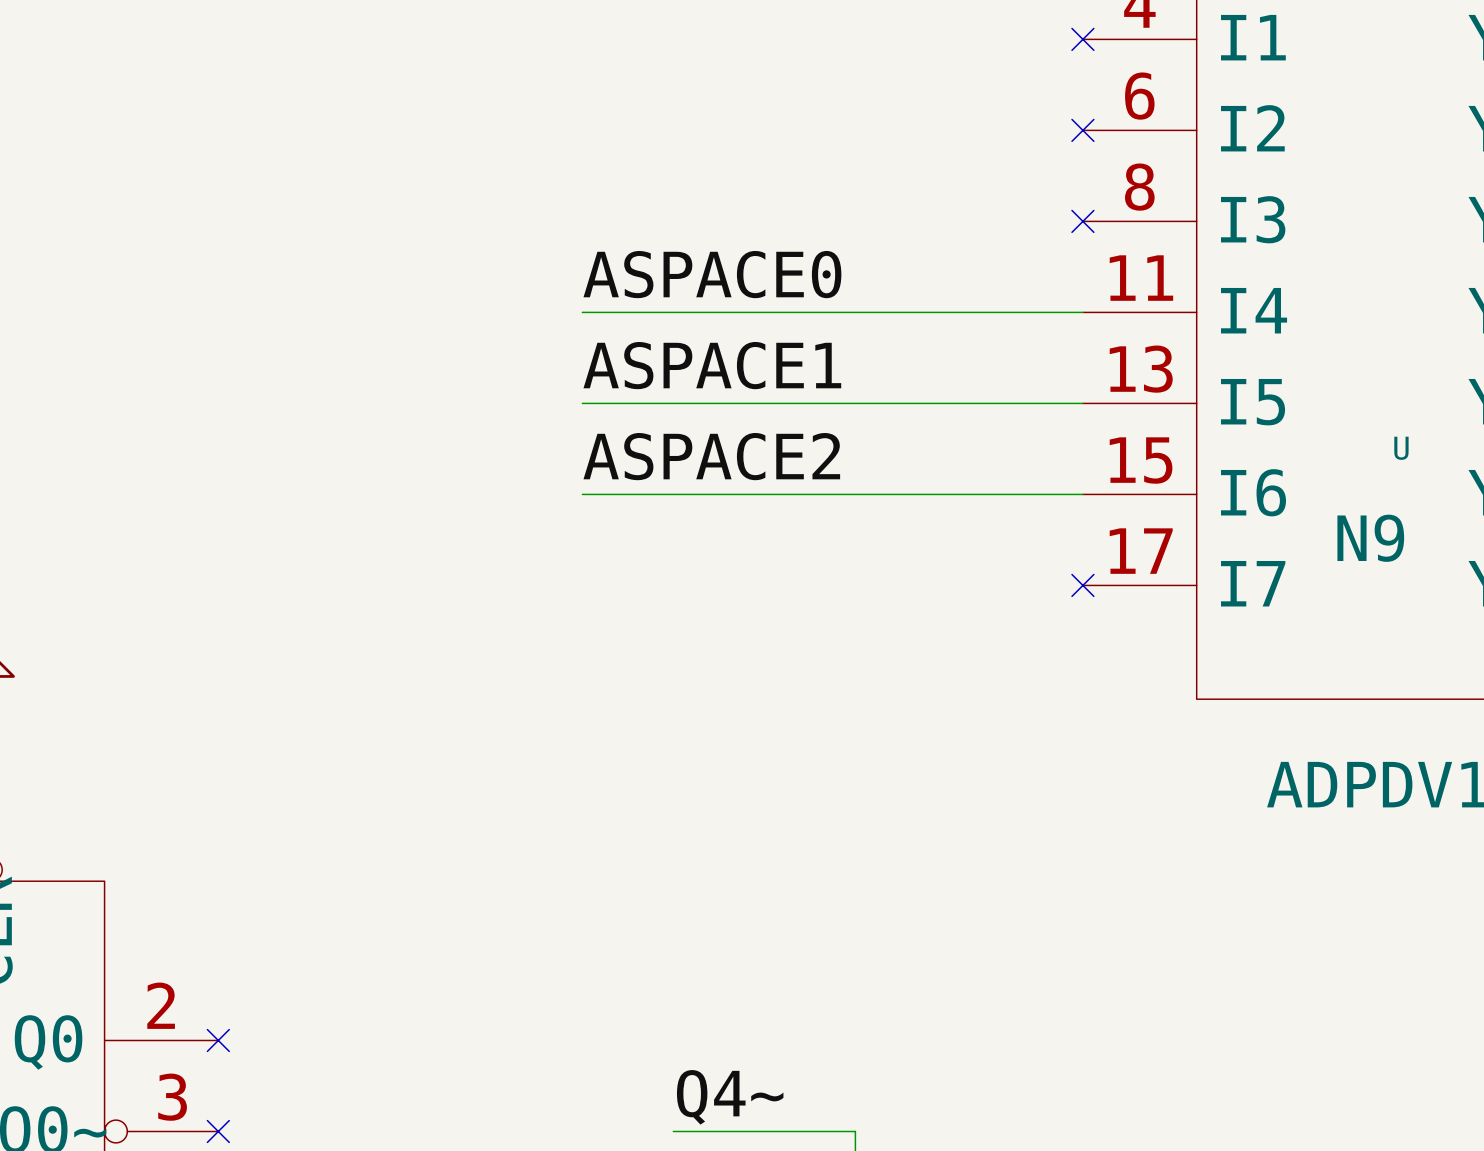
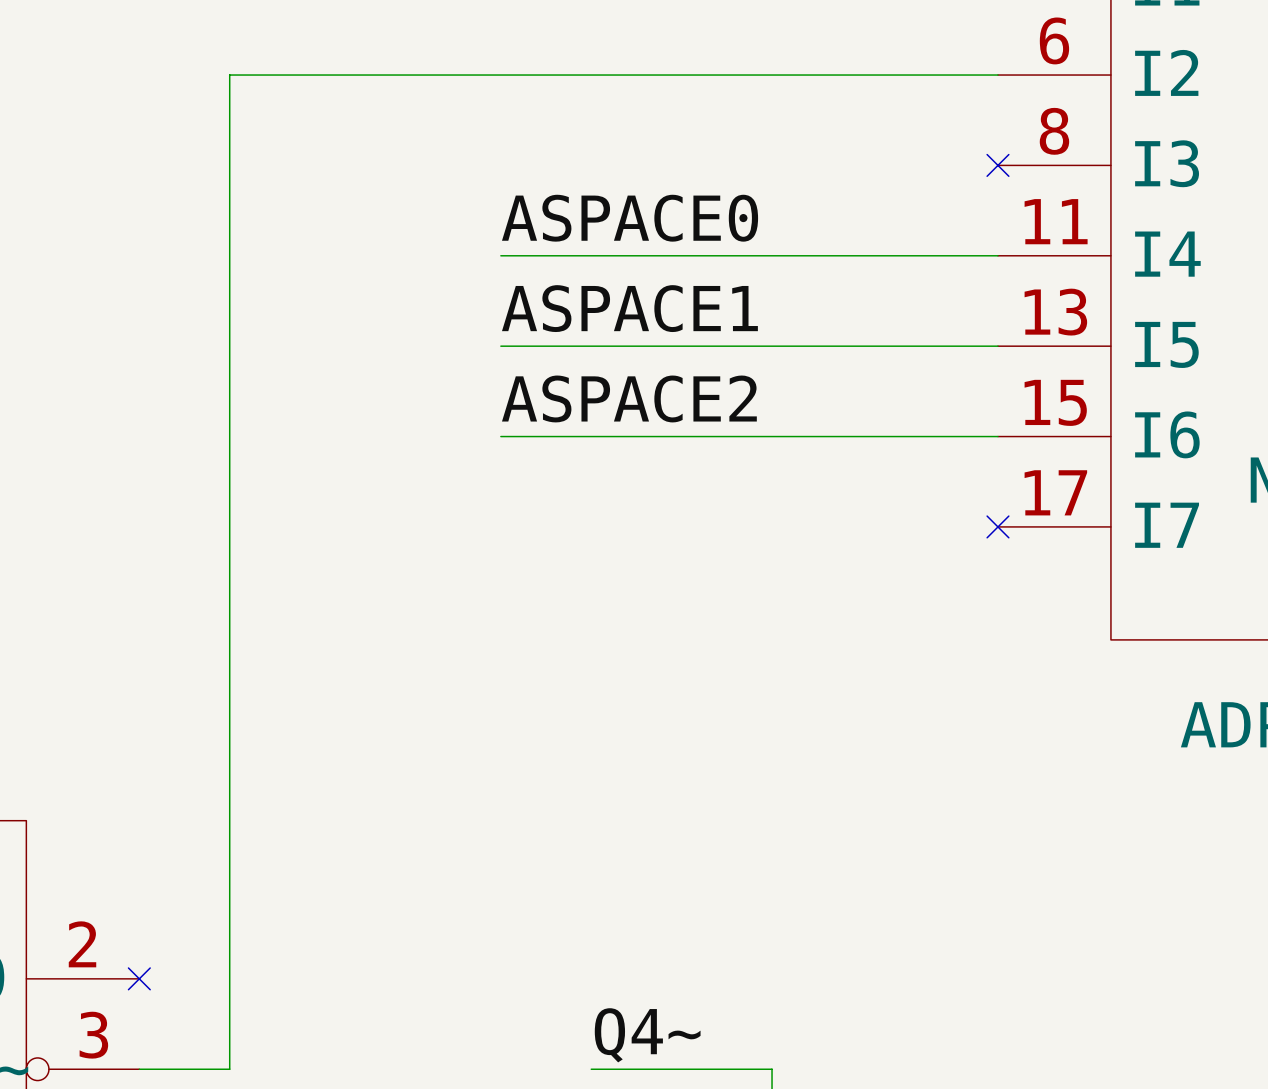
wire: none -> (997, 75) (229, 75) (229, 1069) (139, 1069)
no-connect mark: (1082, 130) -> none
no-connect mark: (218, 1131) -> none

